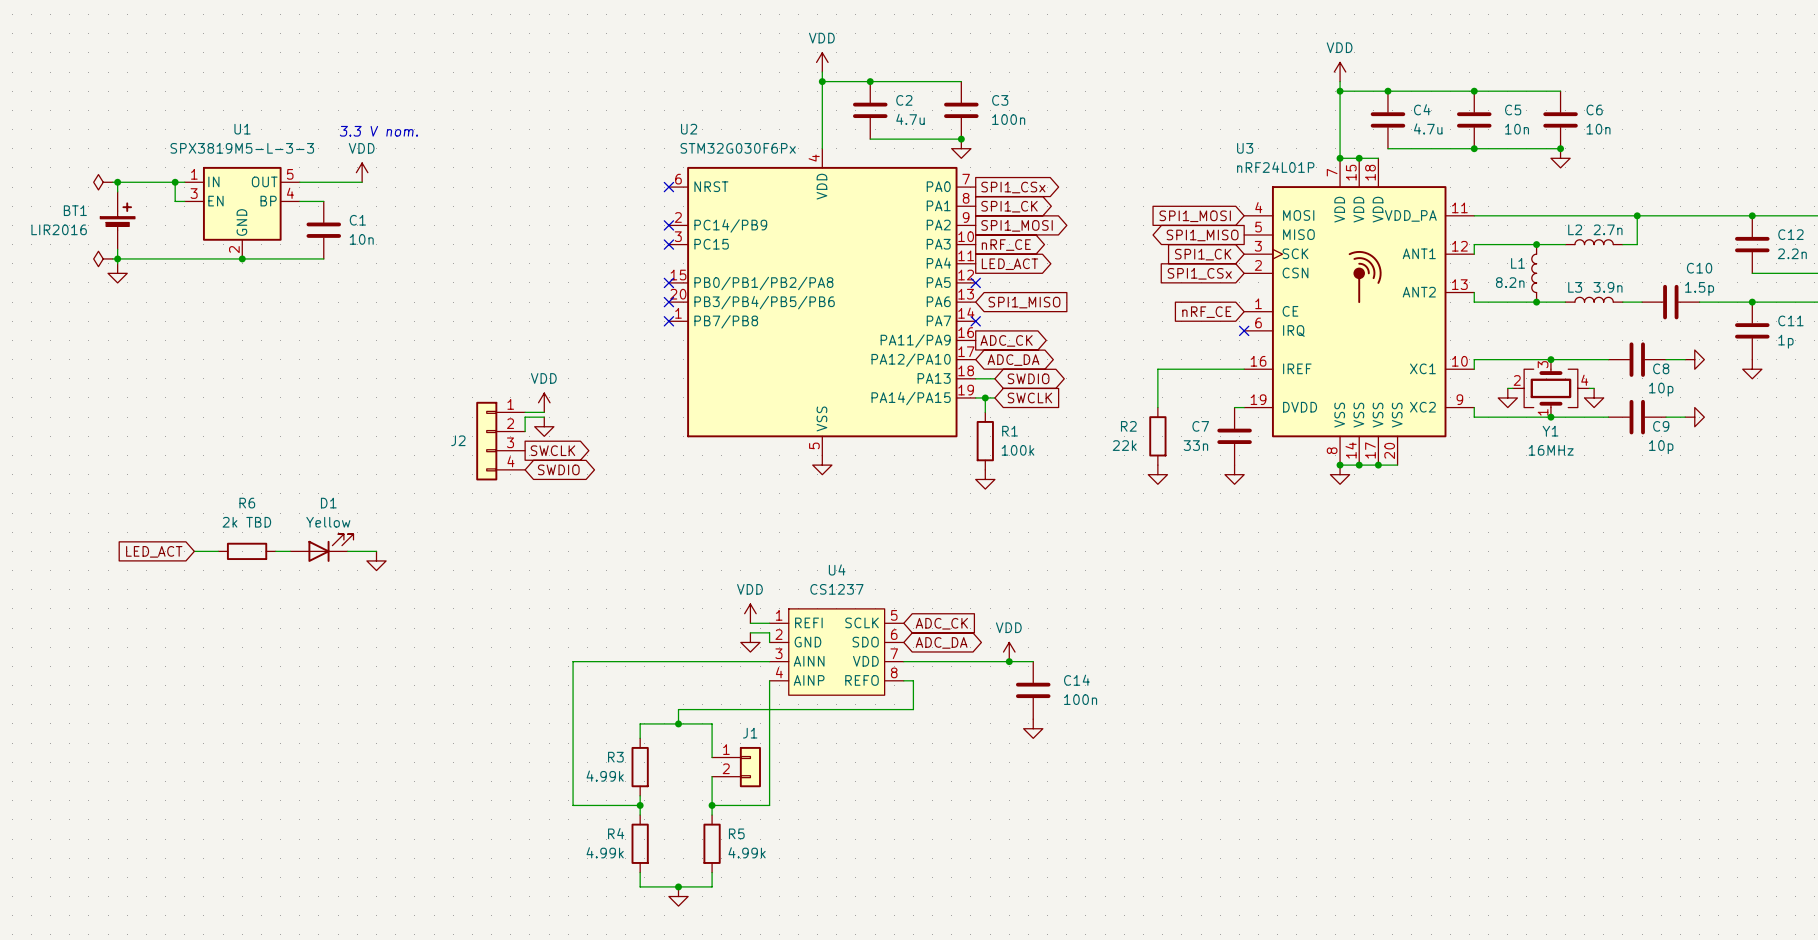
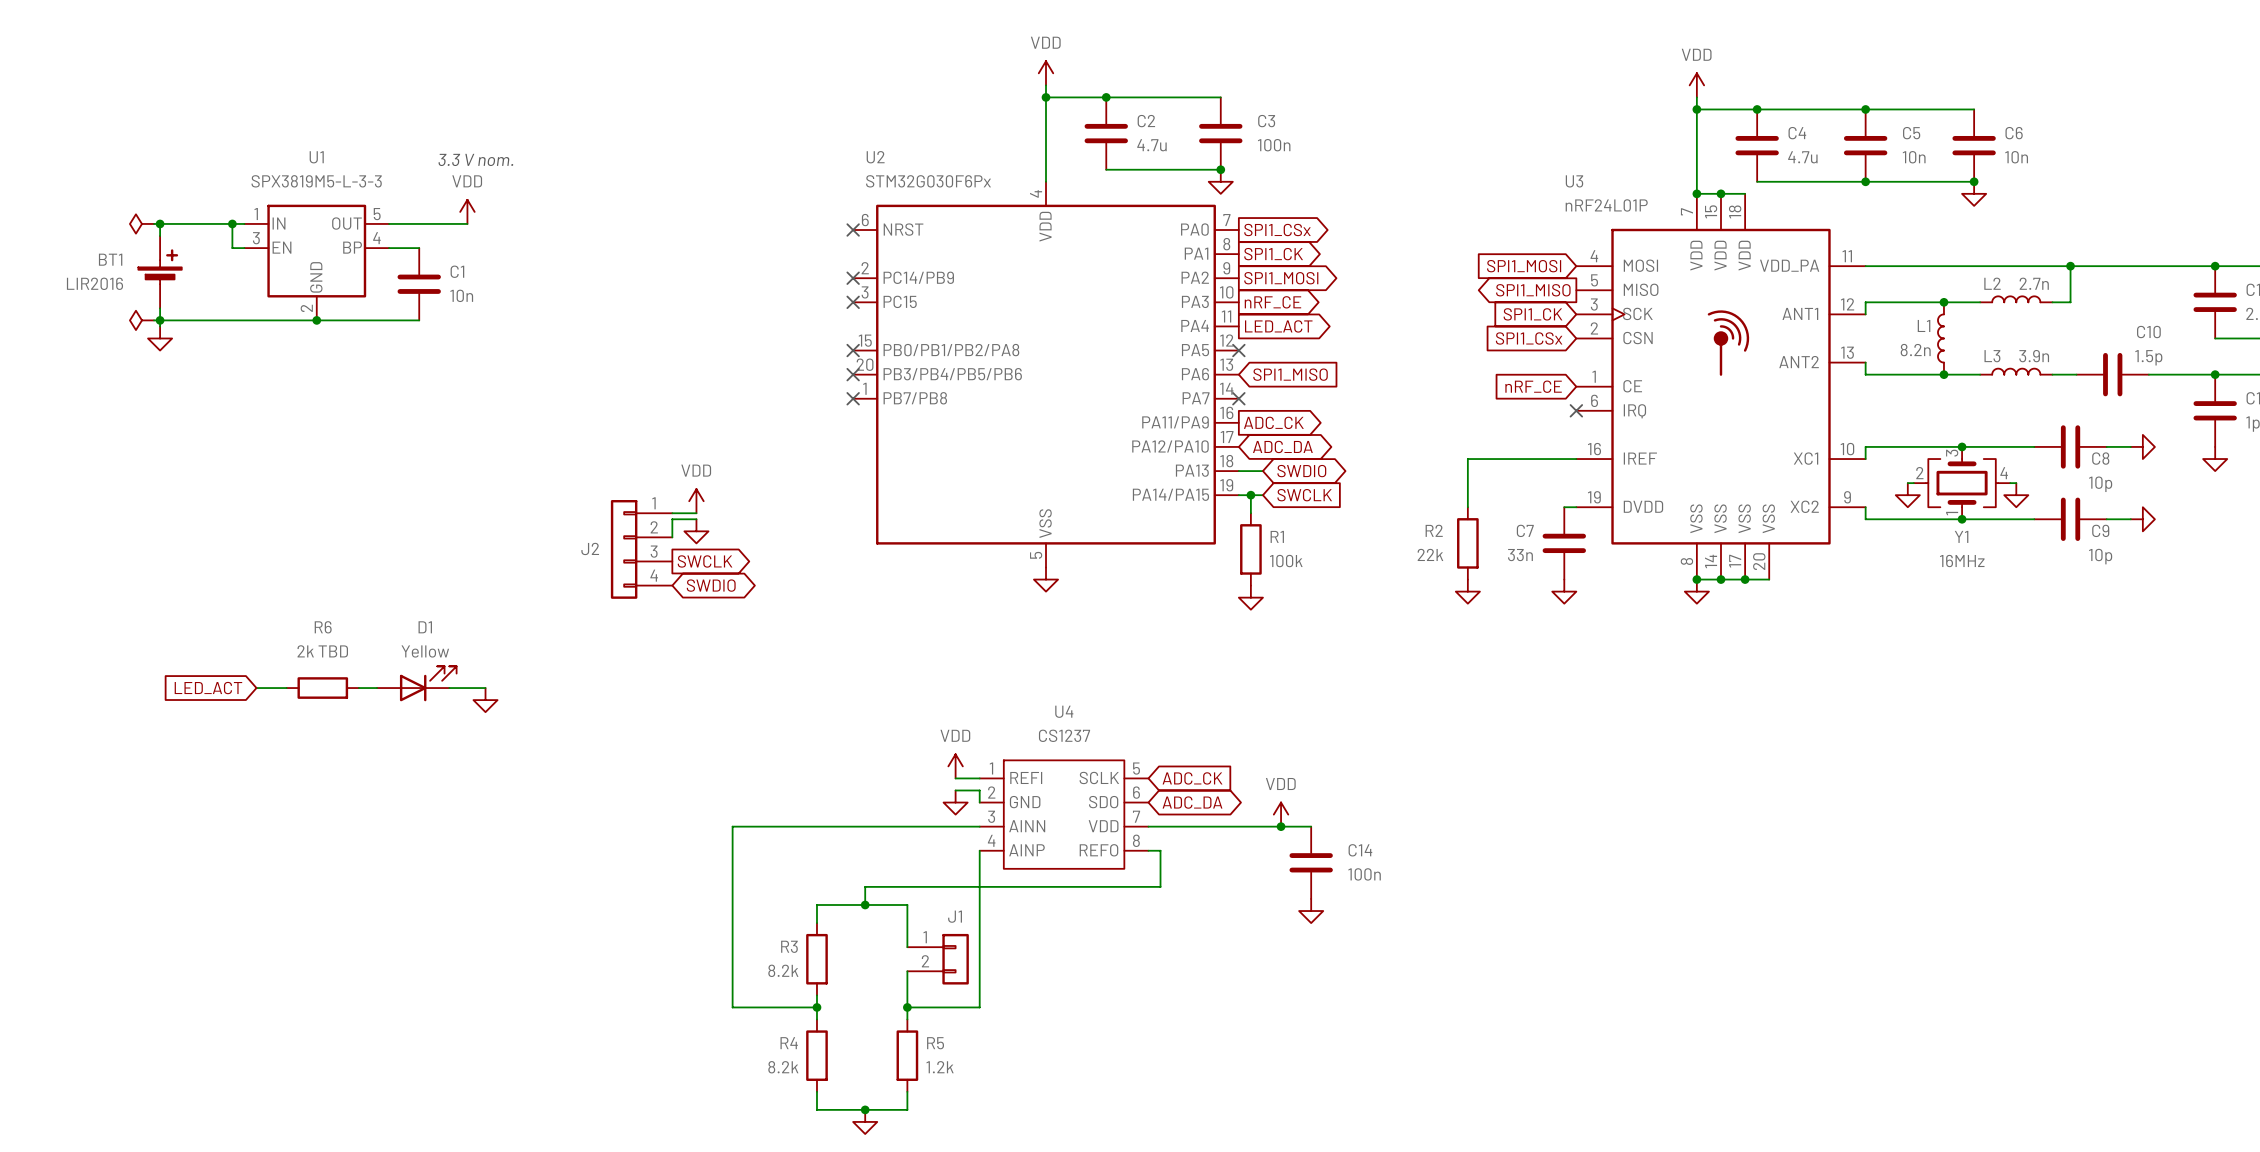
R3 value: 4.99k (605, 776) -> 8.2k (783, 970)
R4 value: 4.99k (605, 852) -> 8.2k (783, 1067)
R5 value: 4.99k (747, 852) -> 1.2k (940, 1067)

